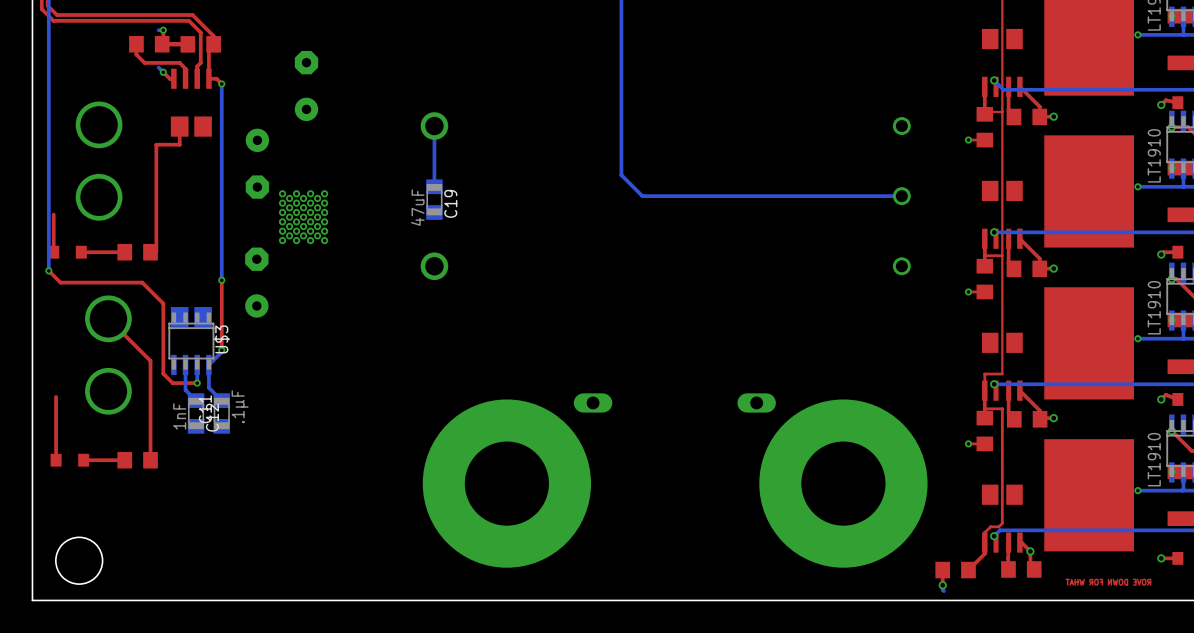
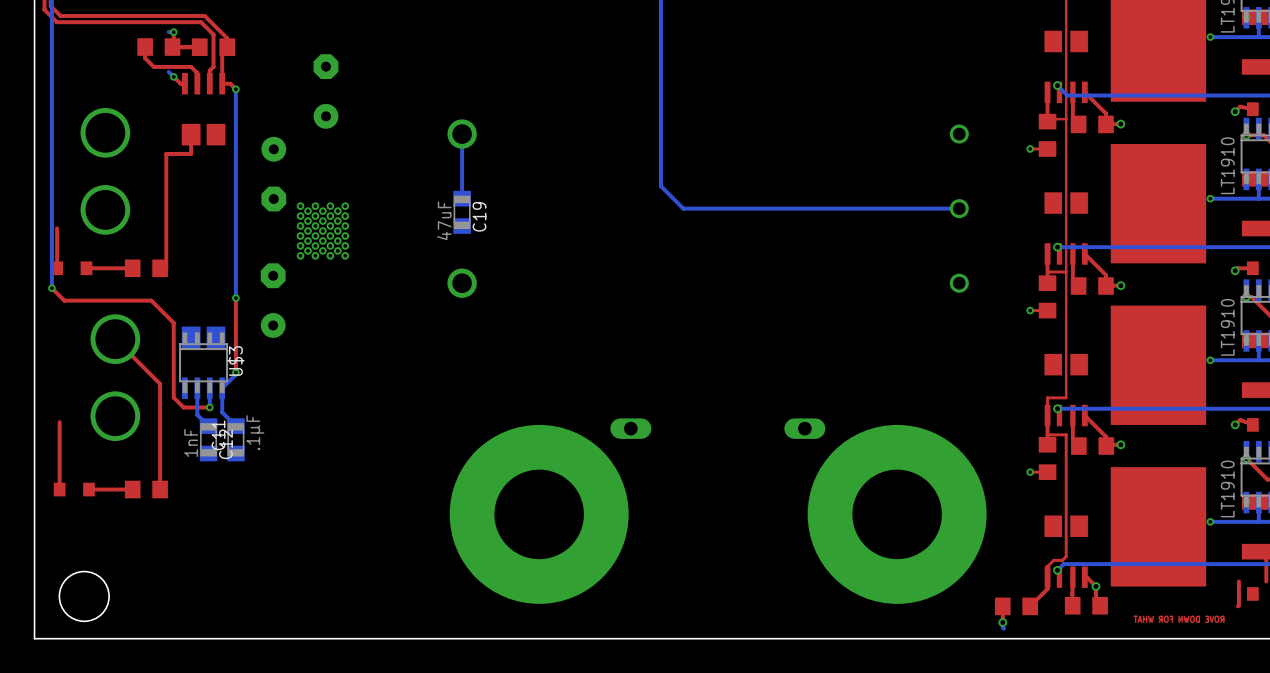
top track: none -> (1259, 551) (1266, 558) (1266, 581)
top track: none -> (1238, 581) (1237, 606)
via: (1161, 558) -> none
top track: (1177, 558) (1161, 558) -> none

